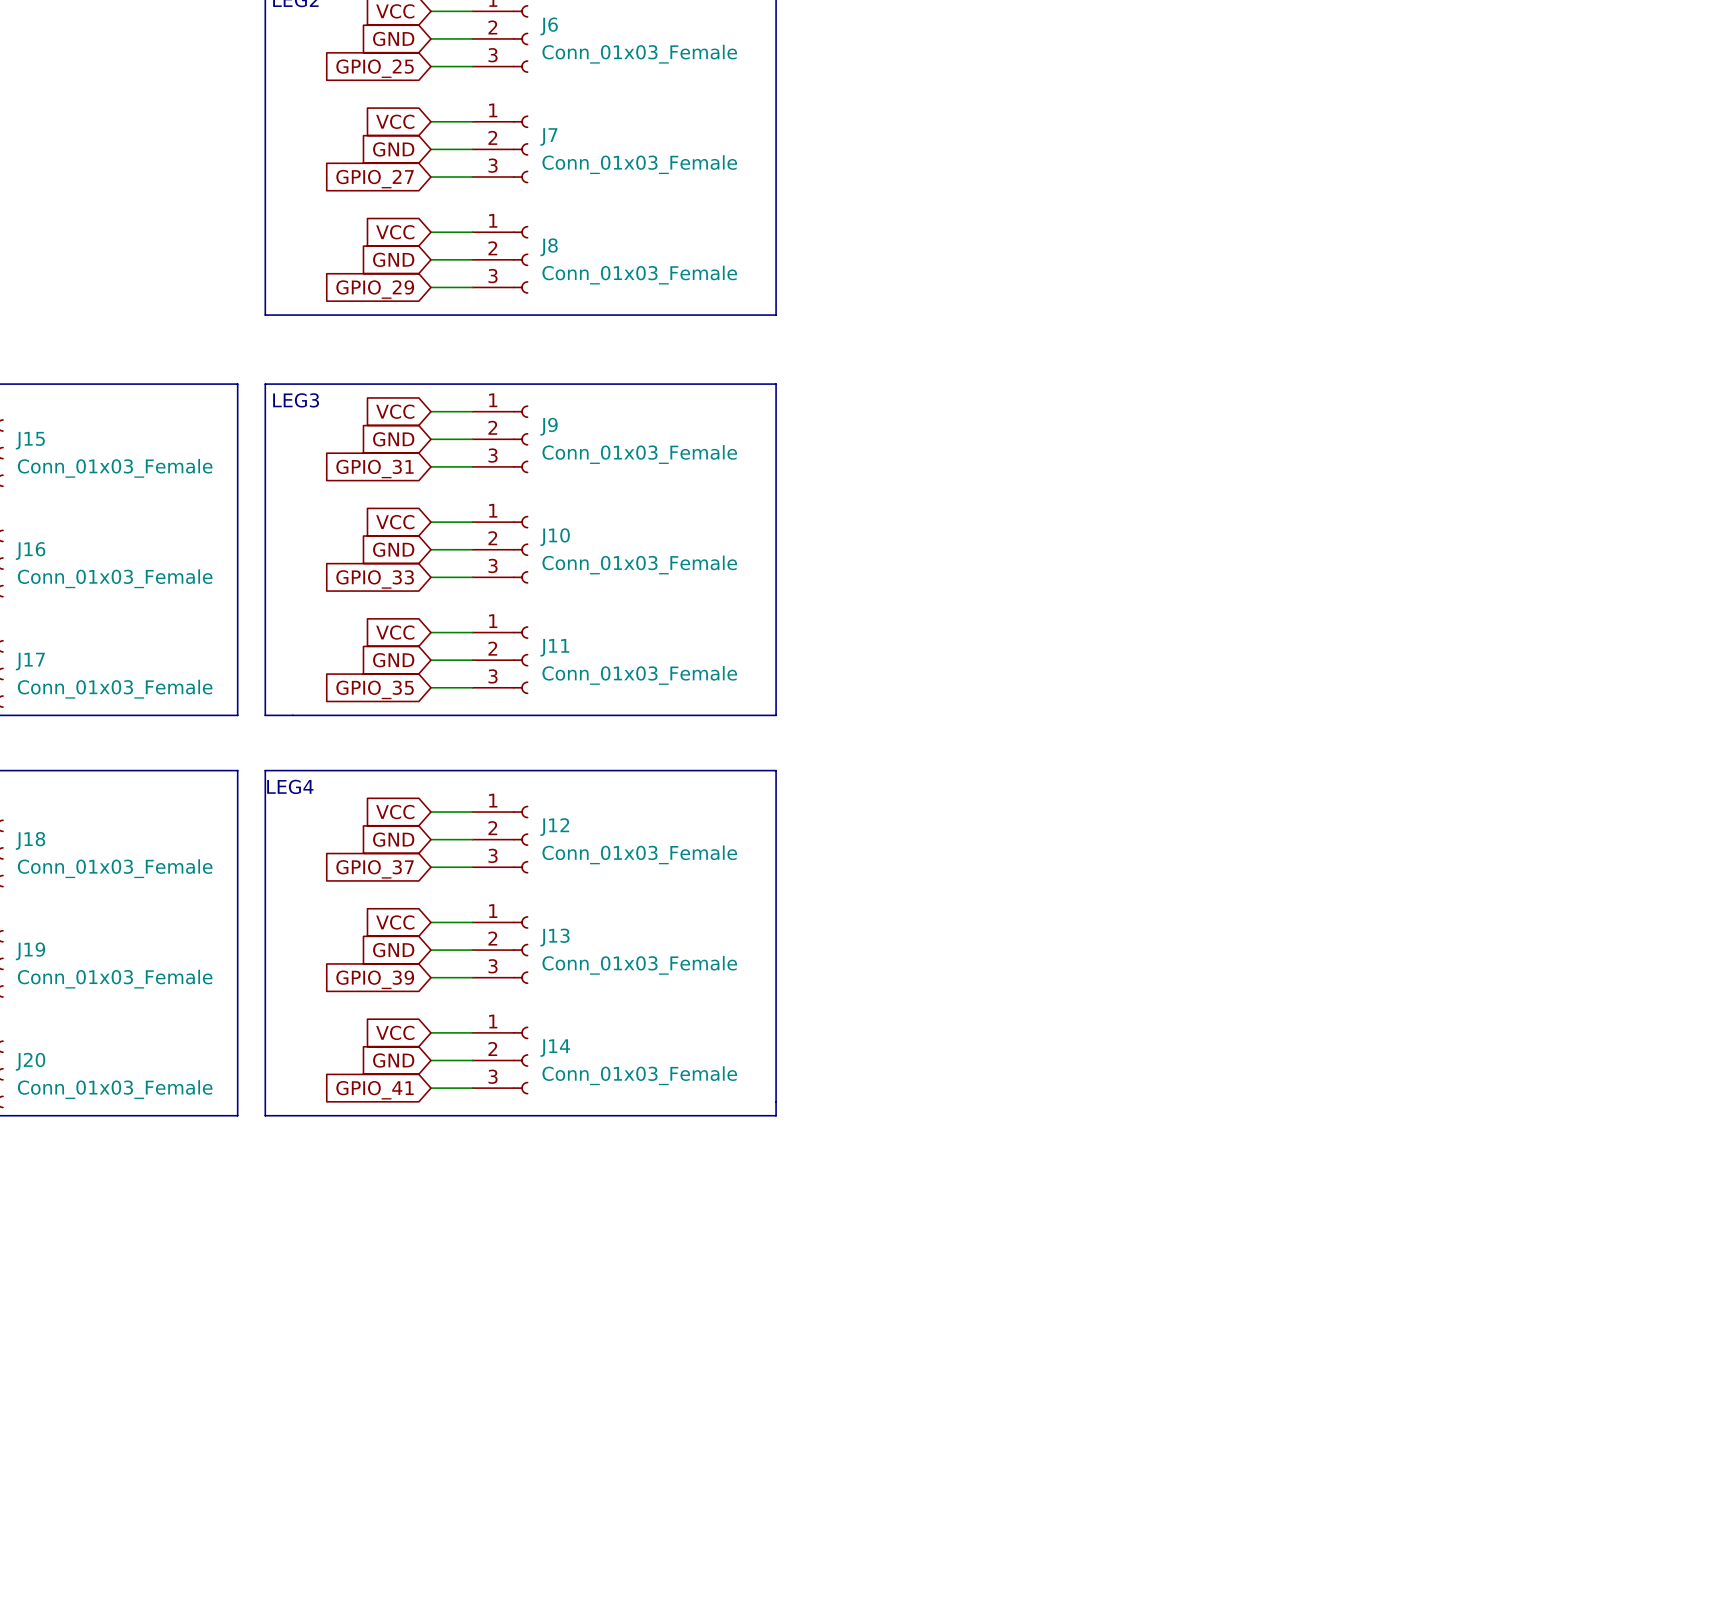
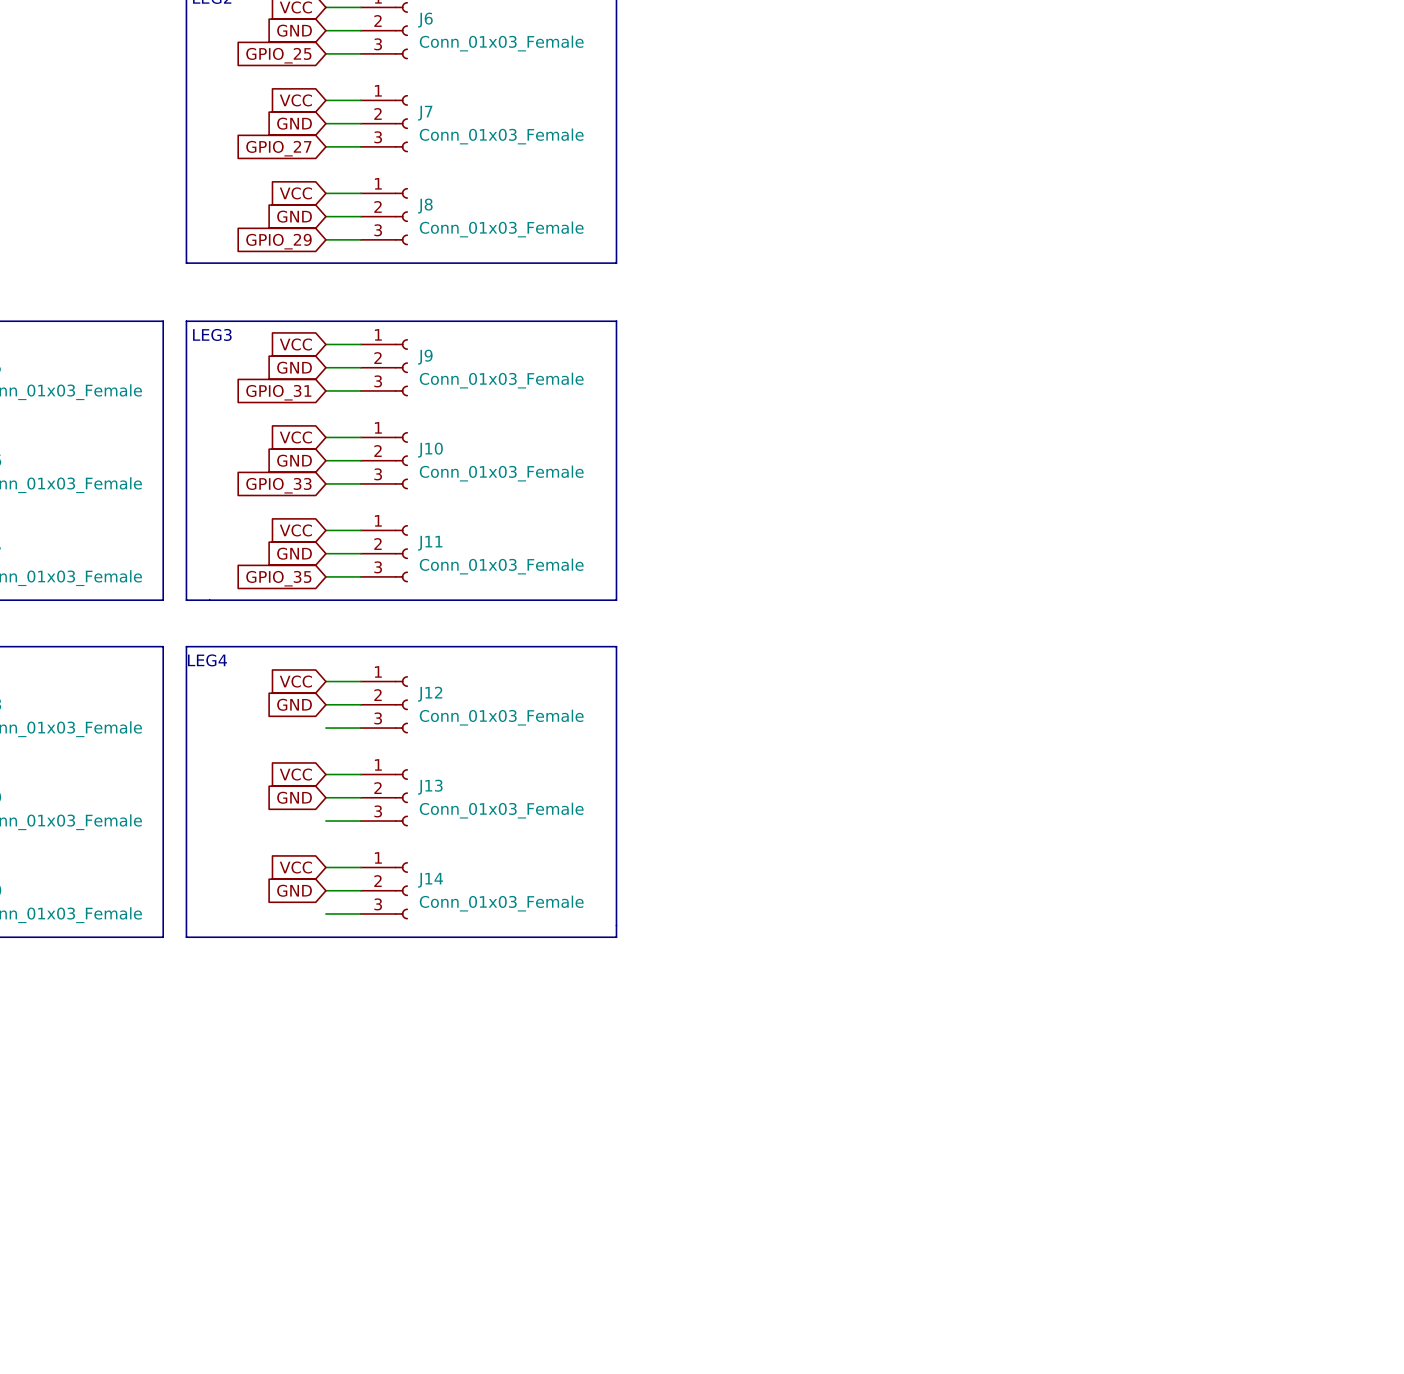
global label: GPIO_37 (375, 869) -> none
global label: GPIO_39 (375, 979) -> none
global label: GPIO_41 (375, 1090) -> none

